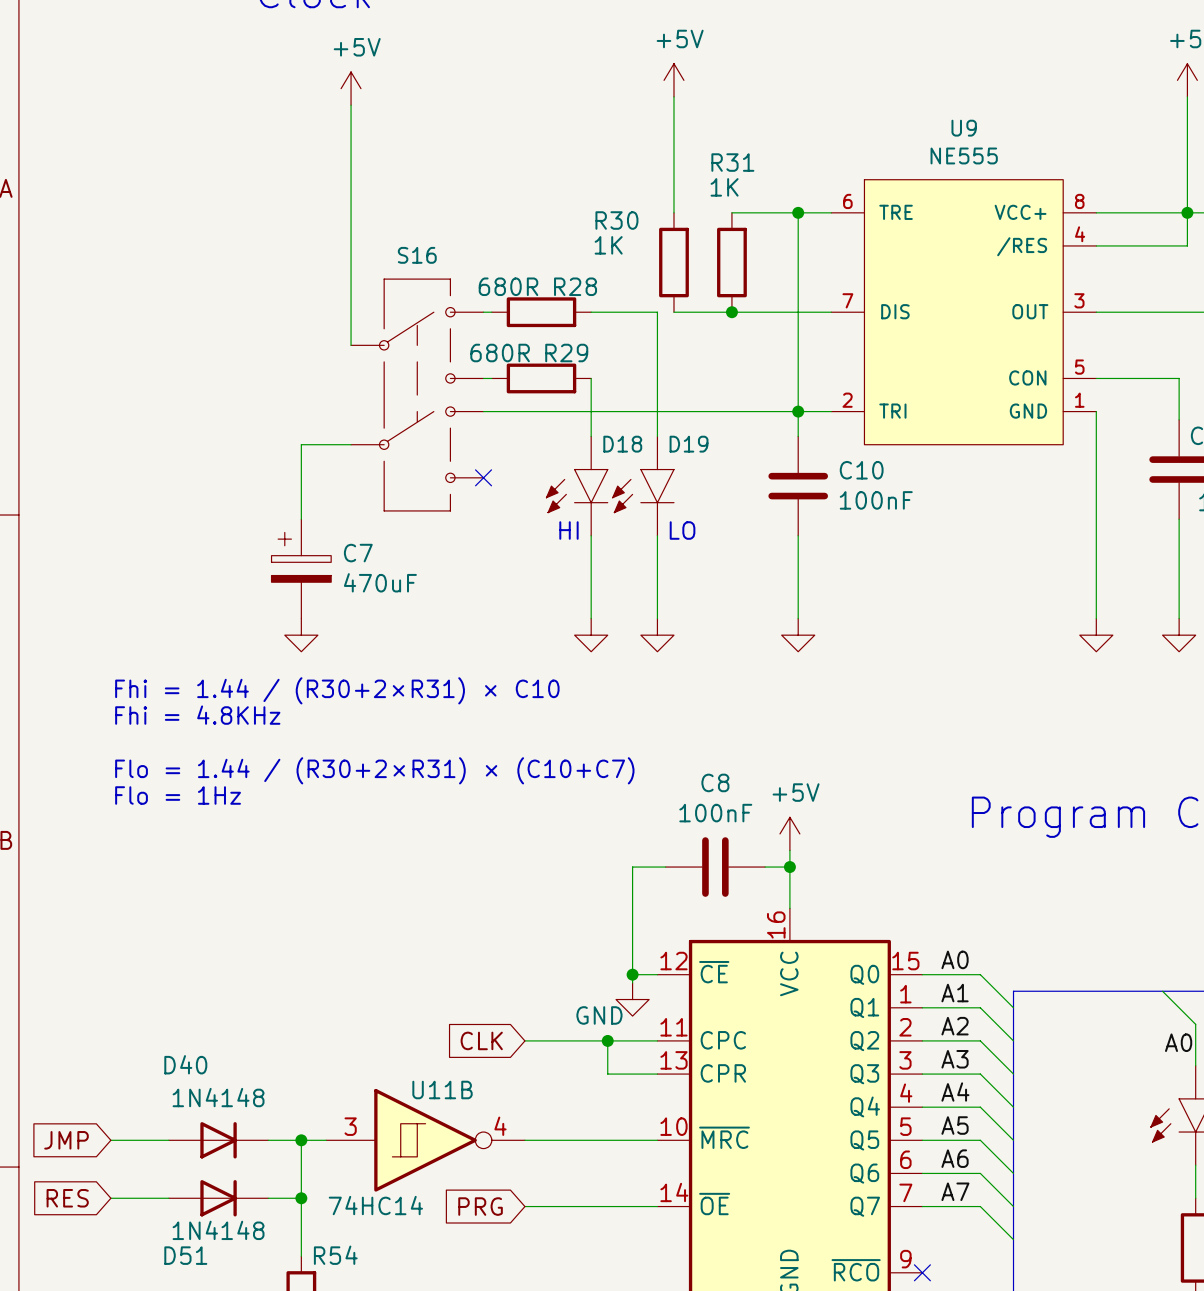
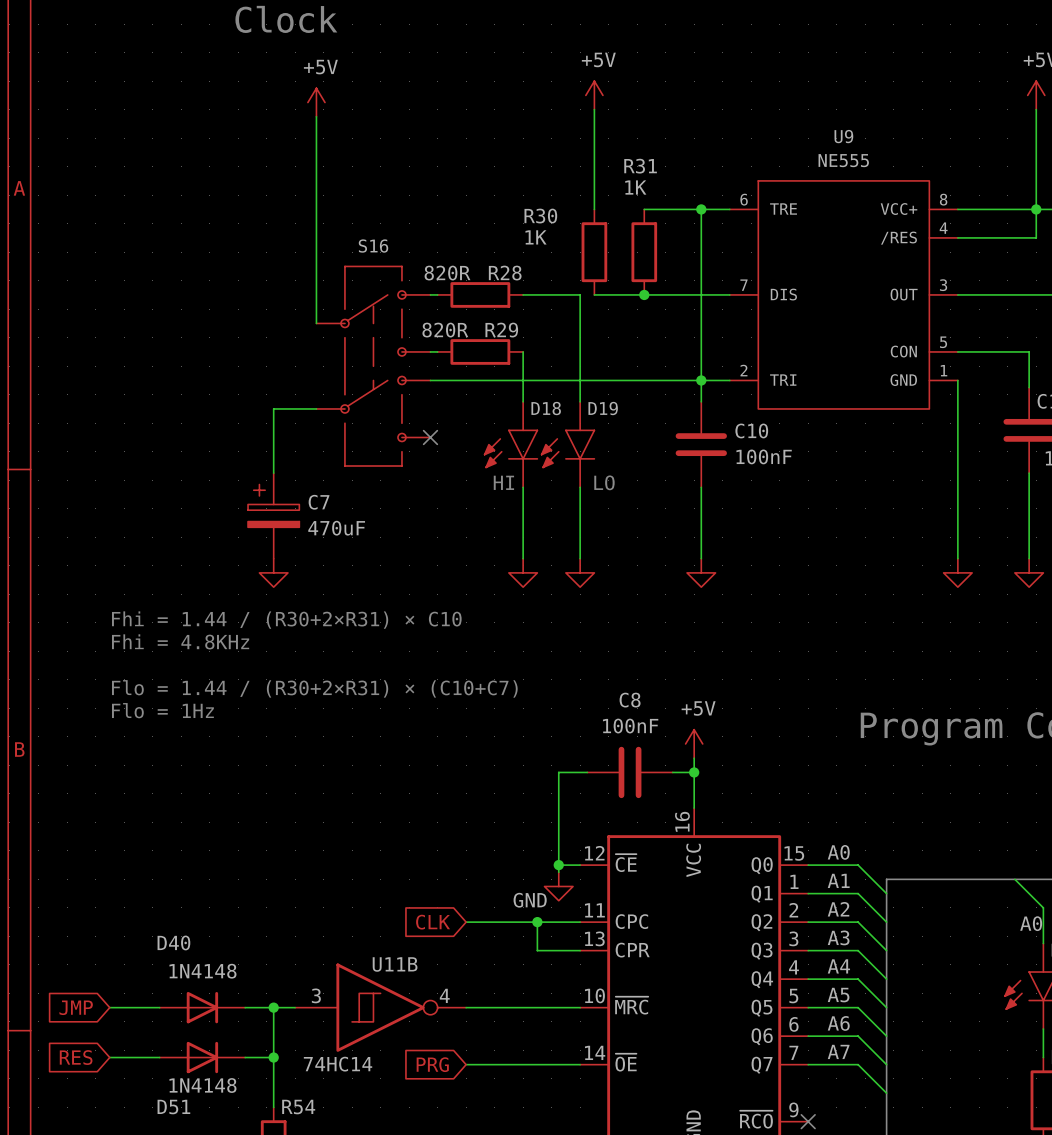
R28 value: 680R (508, 286) -> 820R (447, 273)
R29 value: 680R (500, 353) -> 820R (445, 330)

